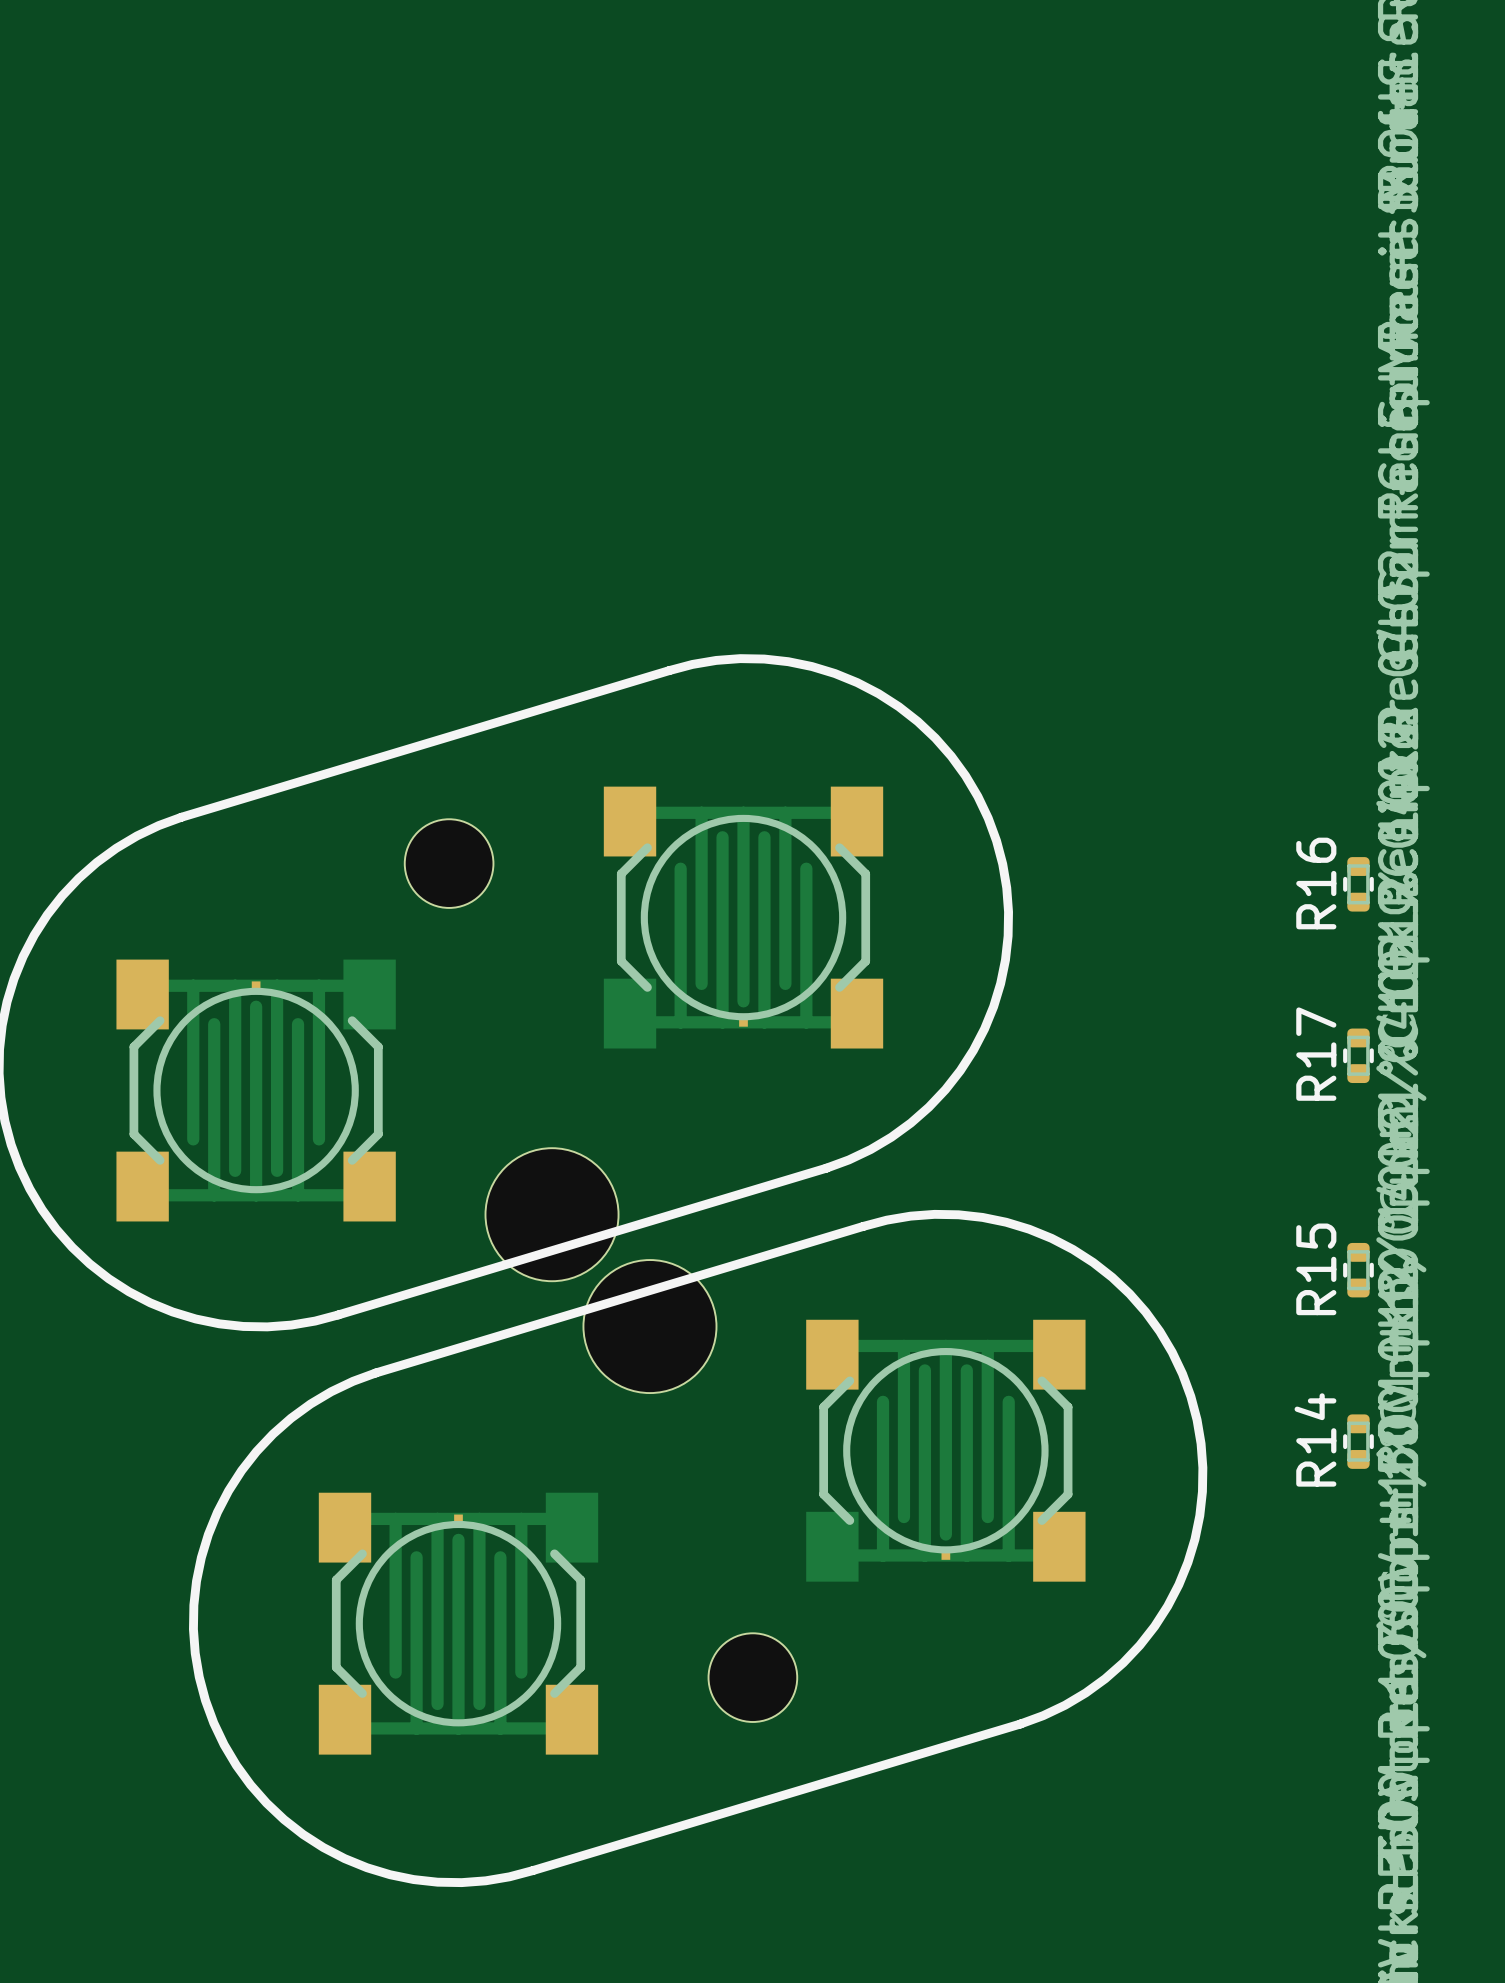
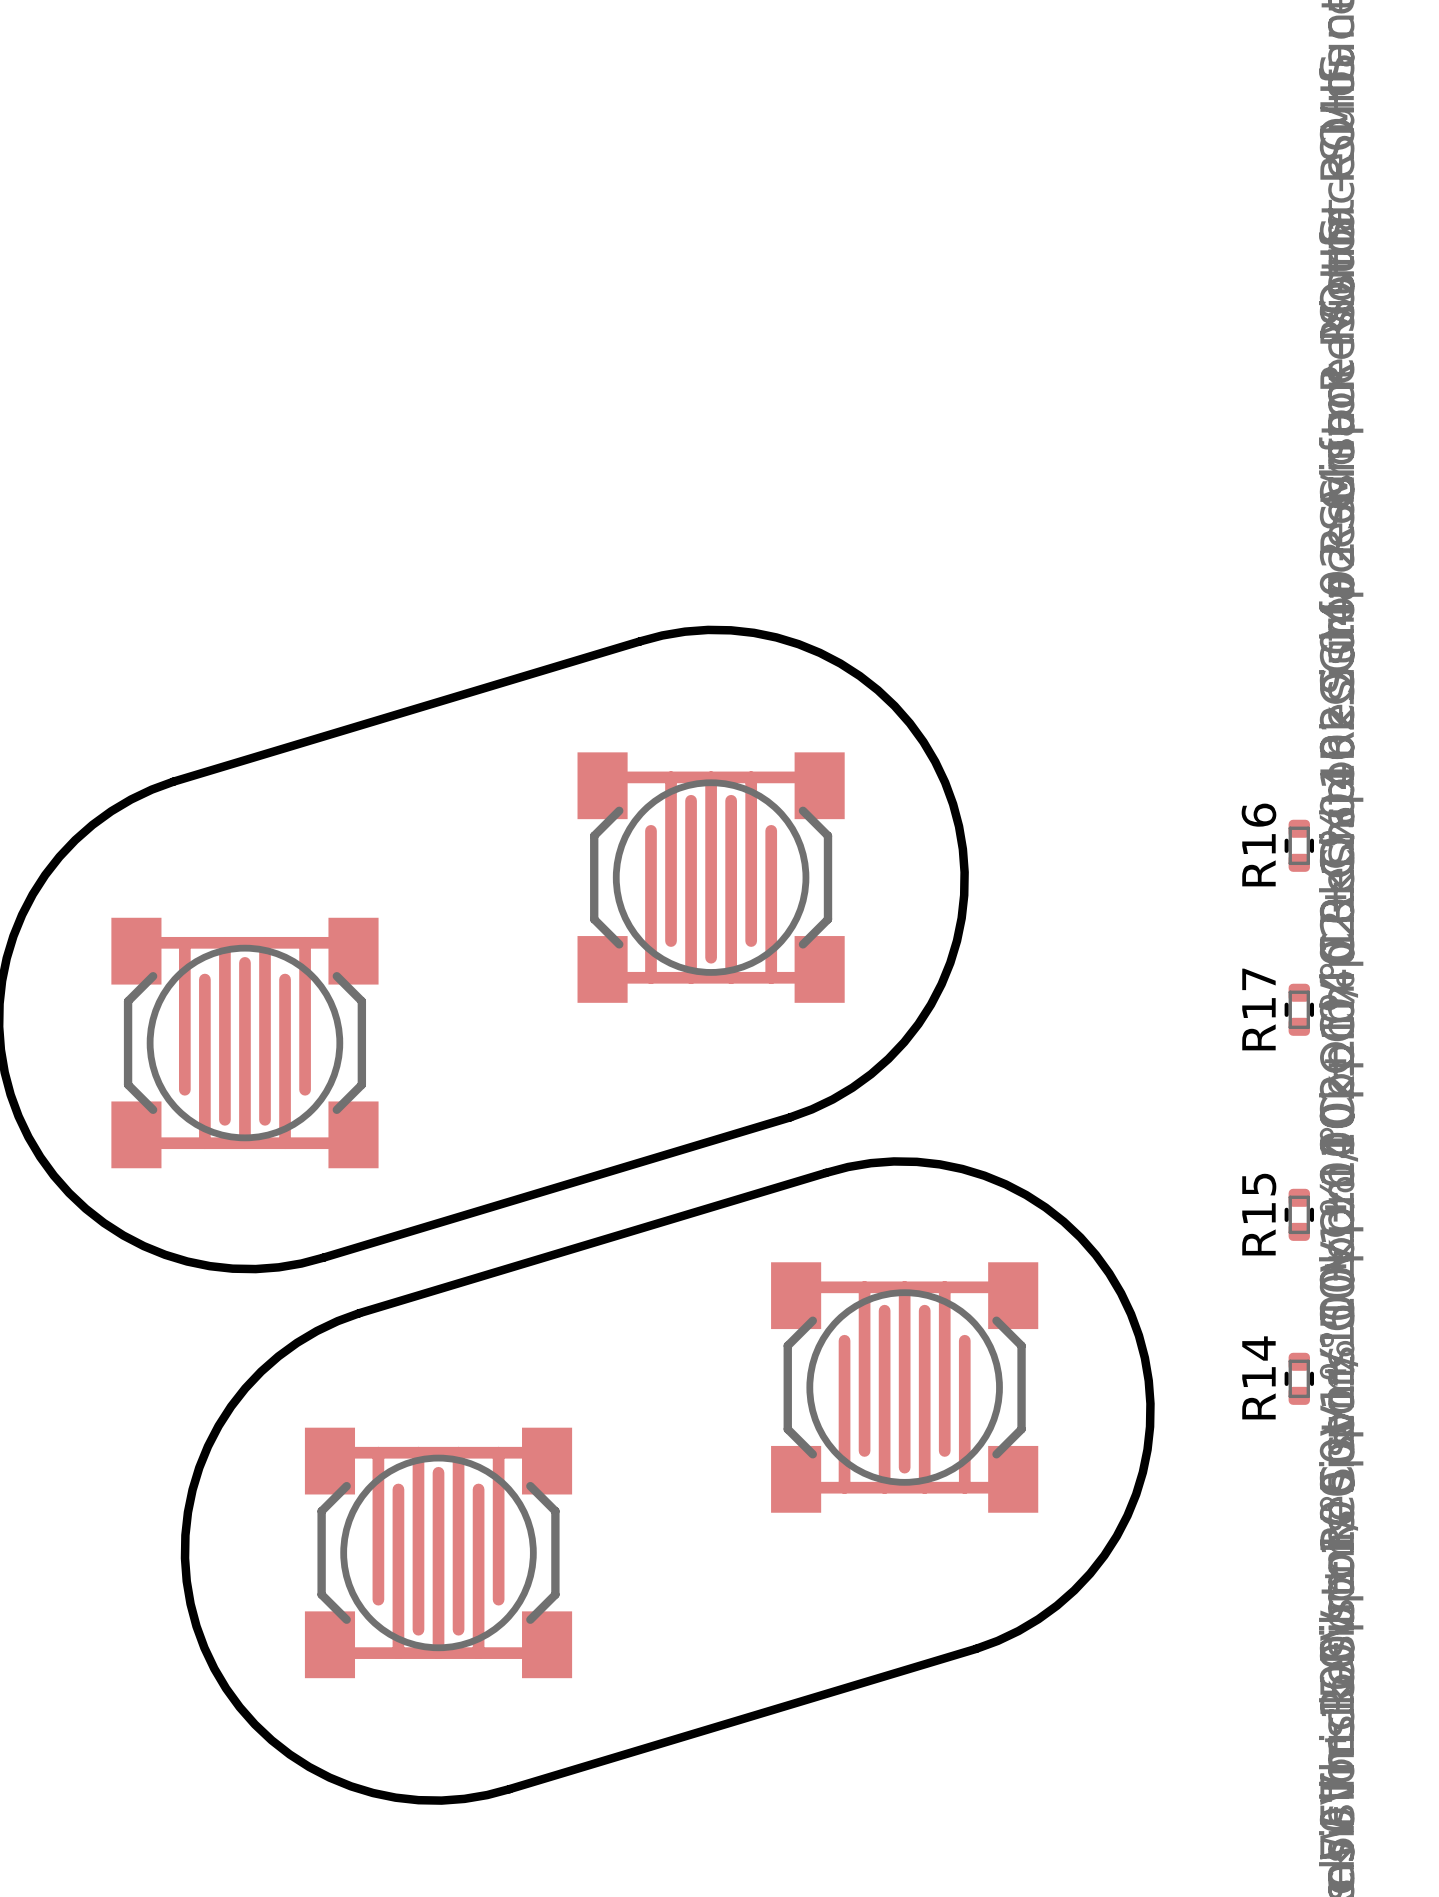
part: (449, 863) -> none
part: (552, 1214) -> none
part: (649, 1326) -> none
part: (752, 1677) -> none

